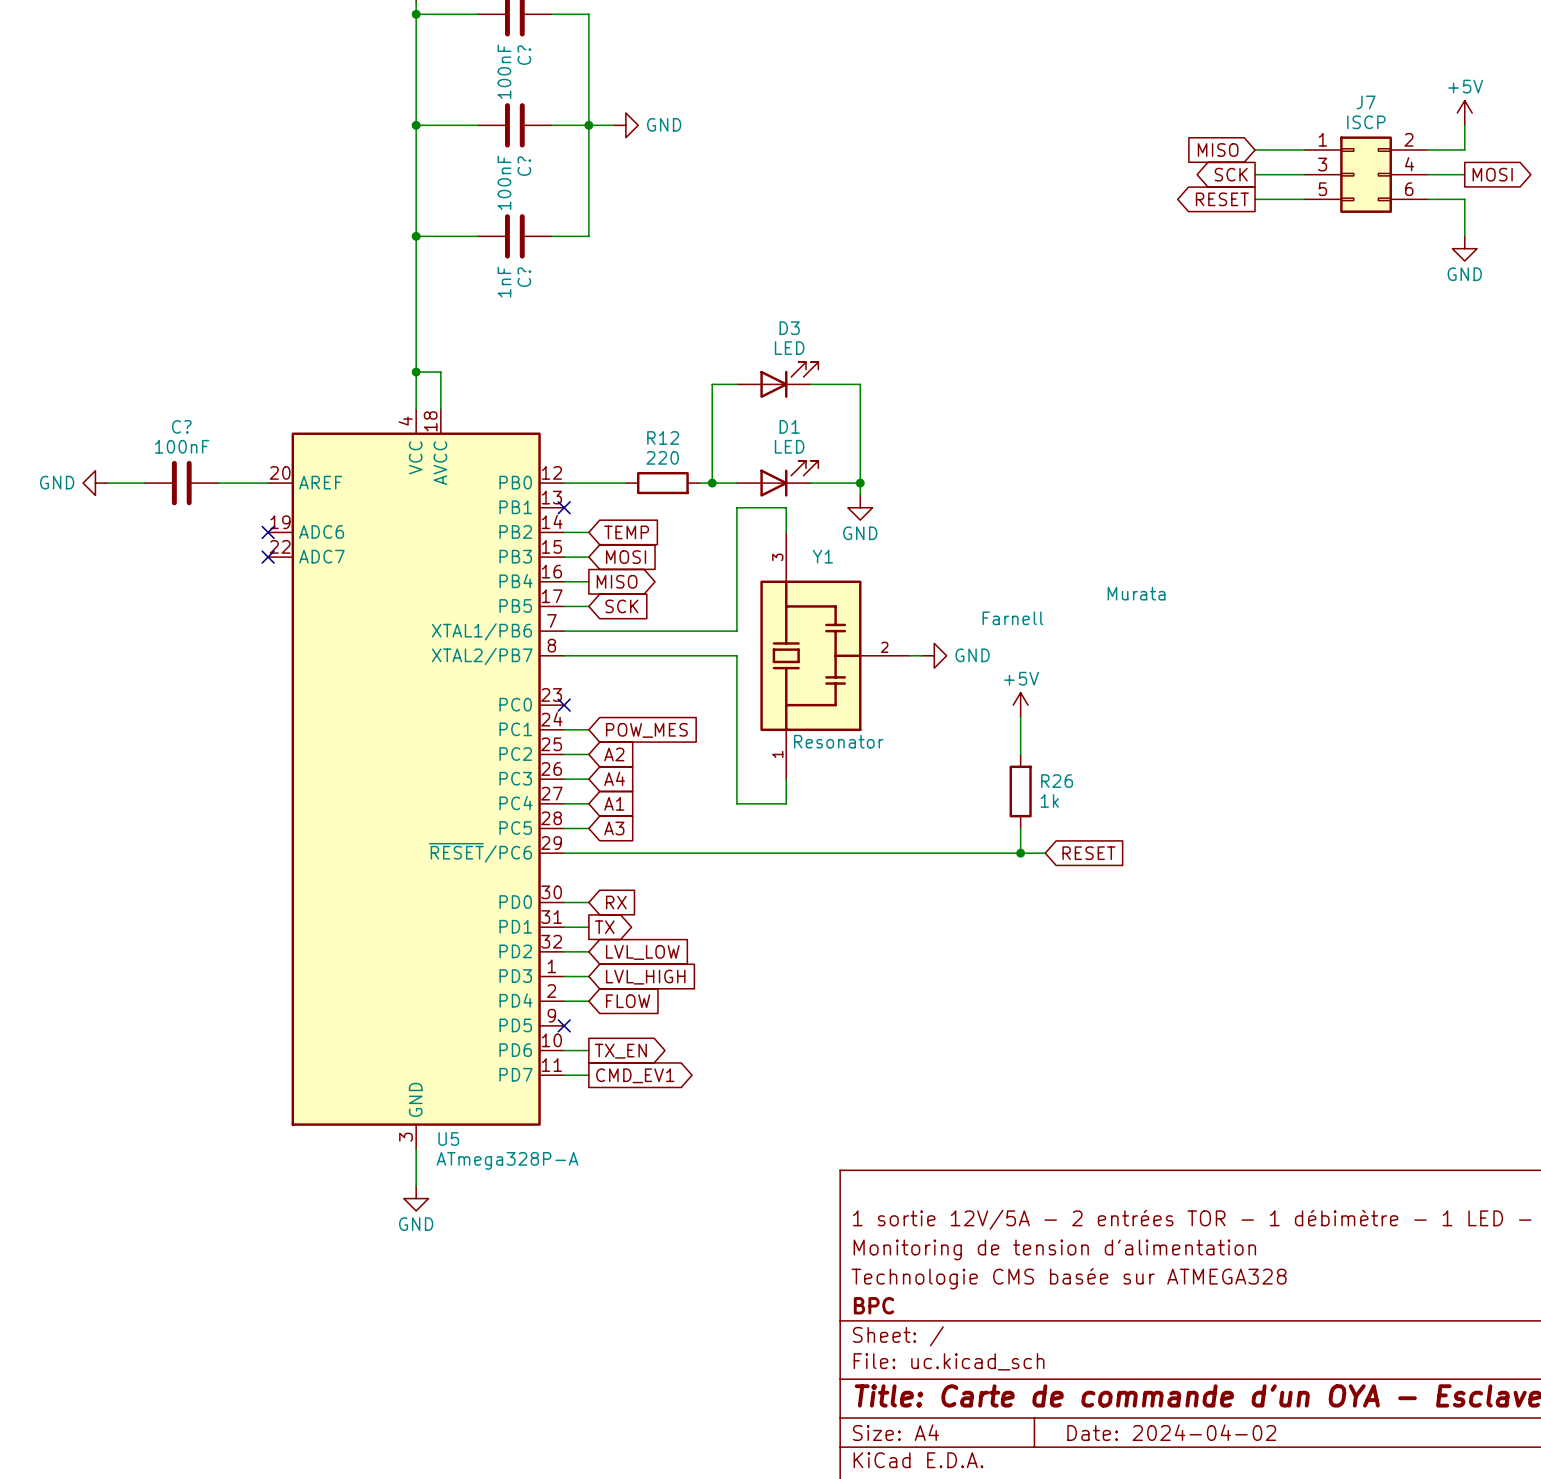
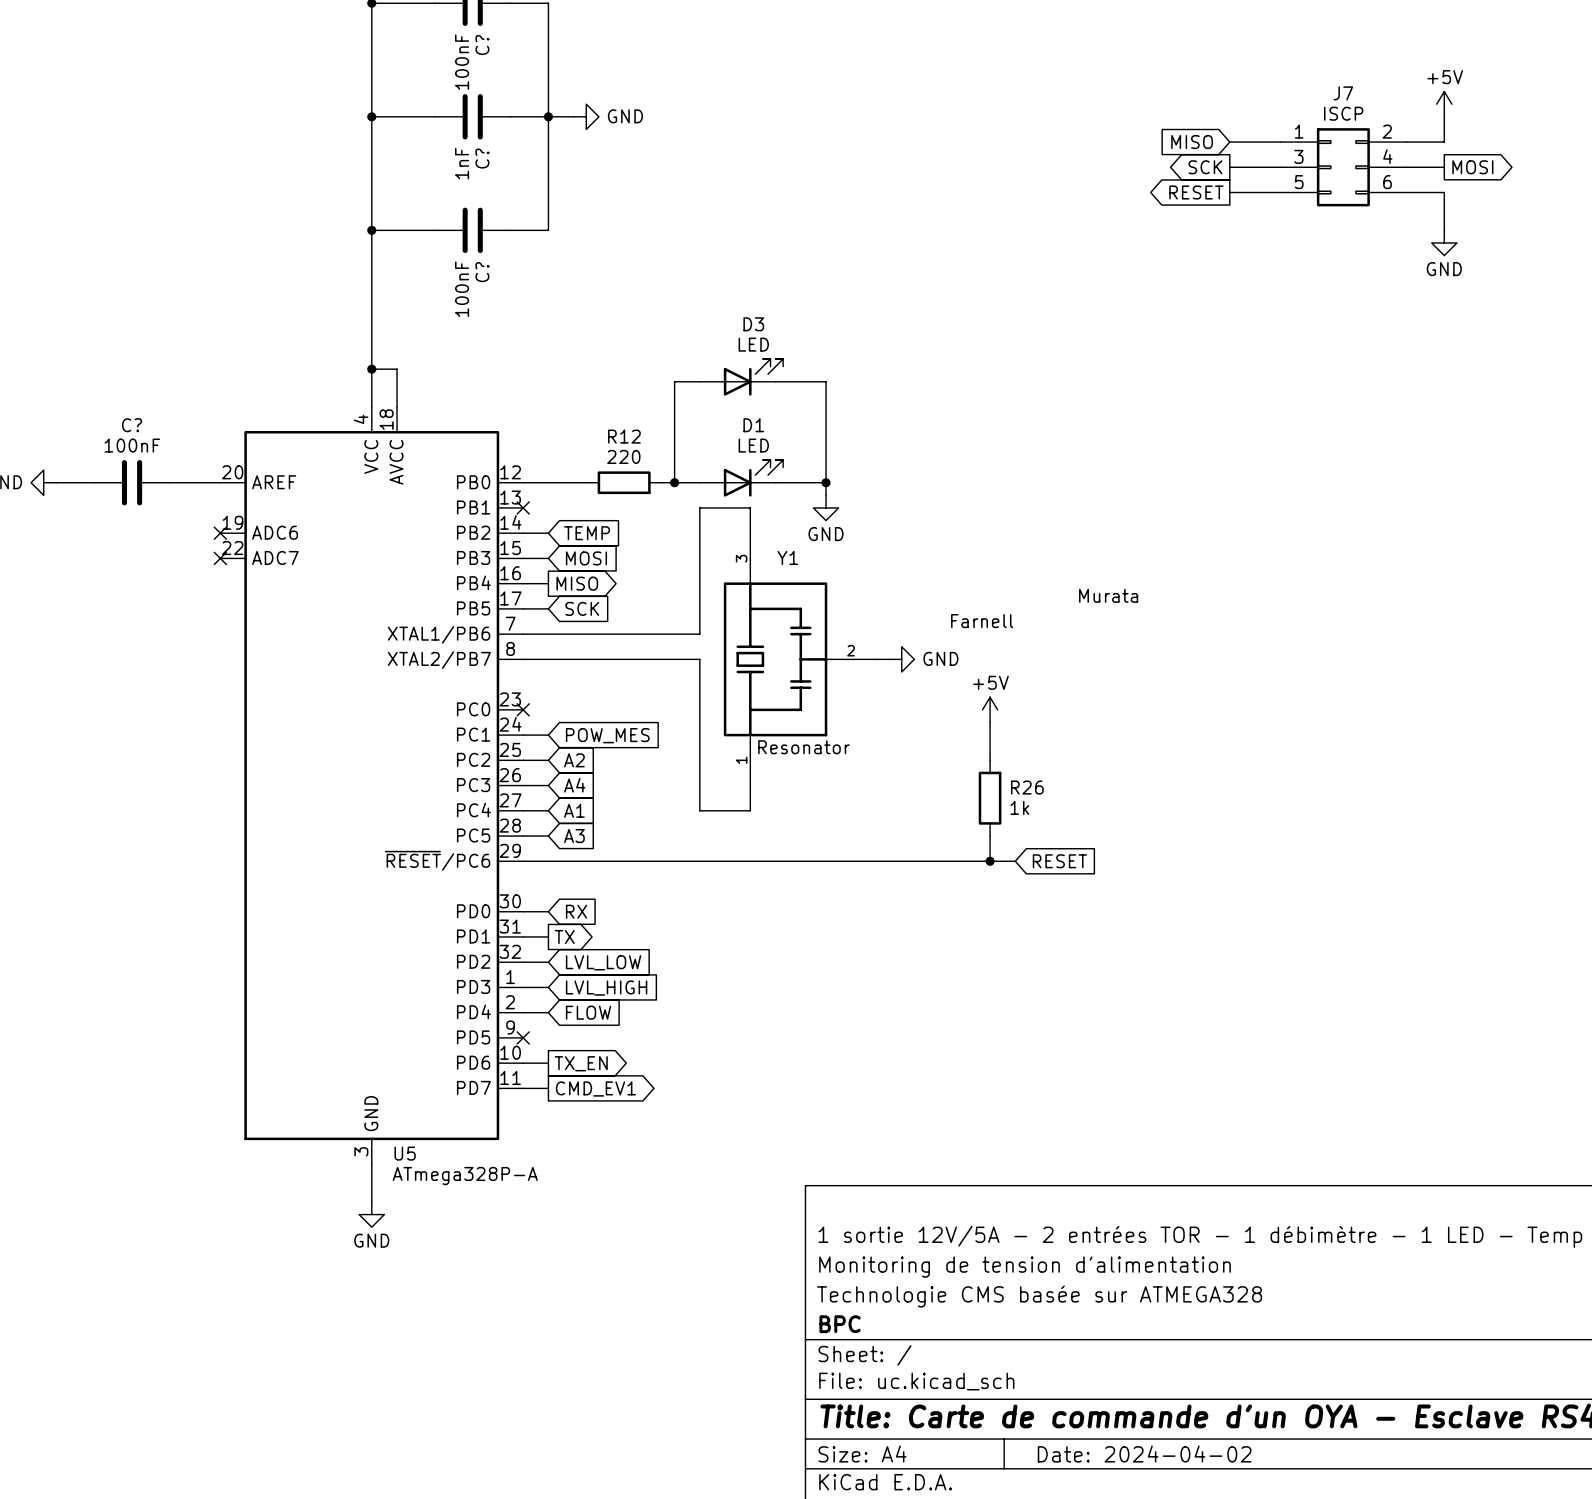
C? value: 100nF (504, 182) -> 1nF (462, 163)
C? value: 1nF (504, 282) -> 100nF (462, 289)

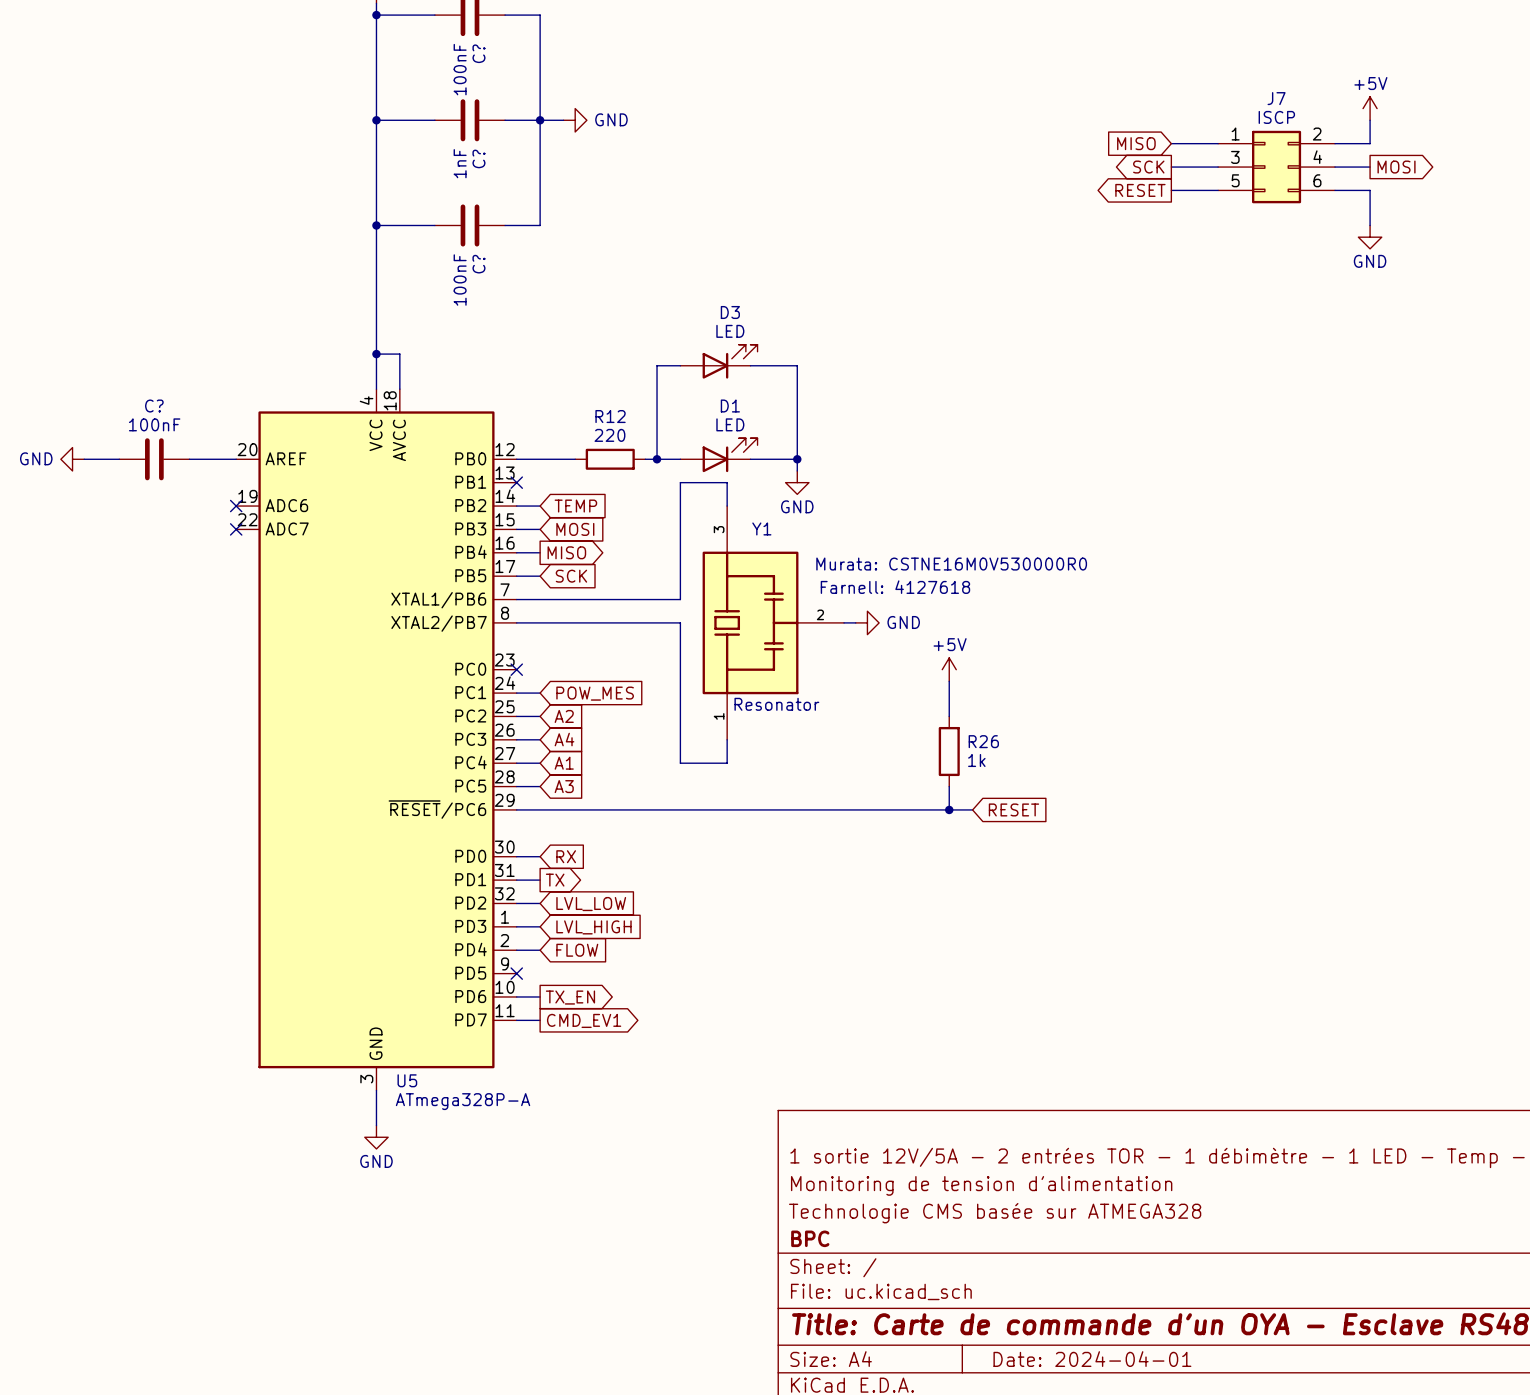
Y1 text: Murata (1108, 595) -> Murata: CSTNE16M0V530000R0 (951, 564)
Y1 text: Farnell (982, 621) -> Farnell: 4127618 (895, 587)
title block: Date: 2024-04-02 (1144, 1454) -> Date: 2024-04-01 (1092, 1359)

